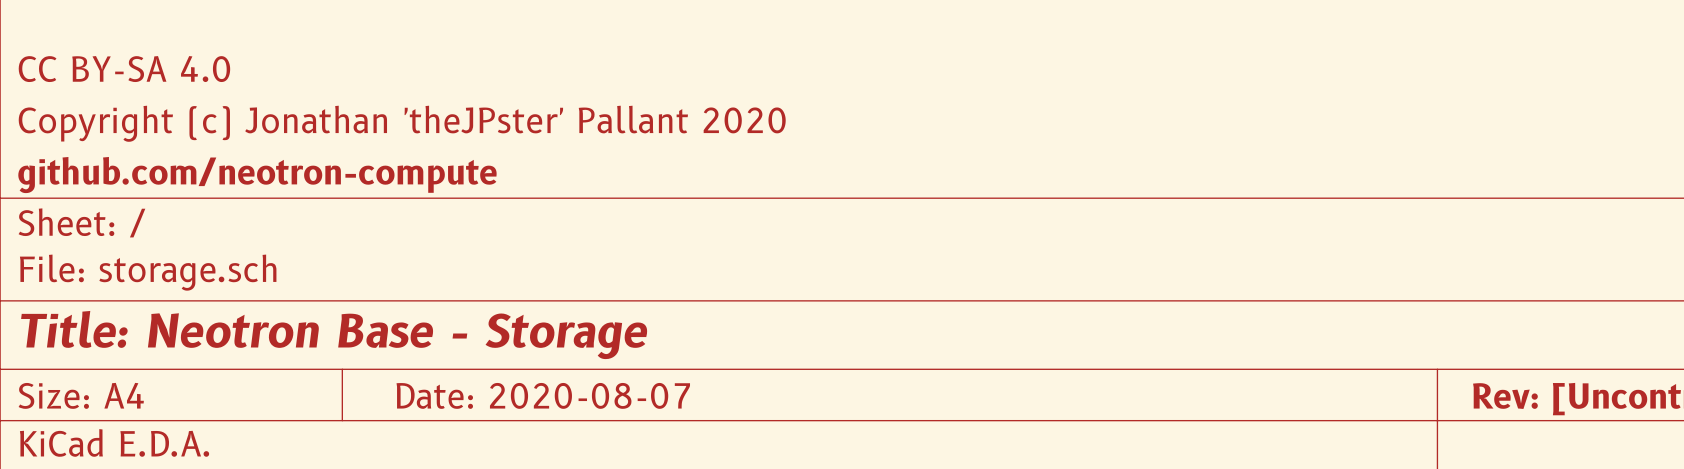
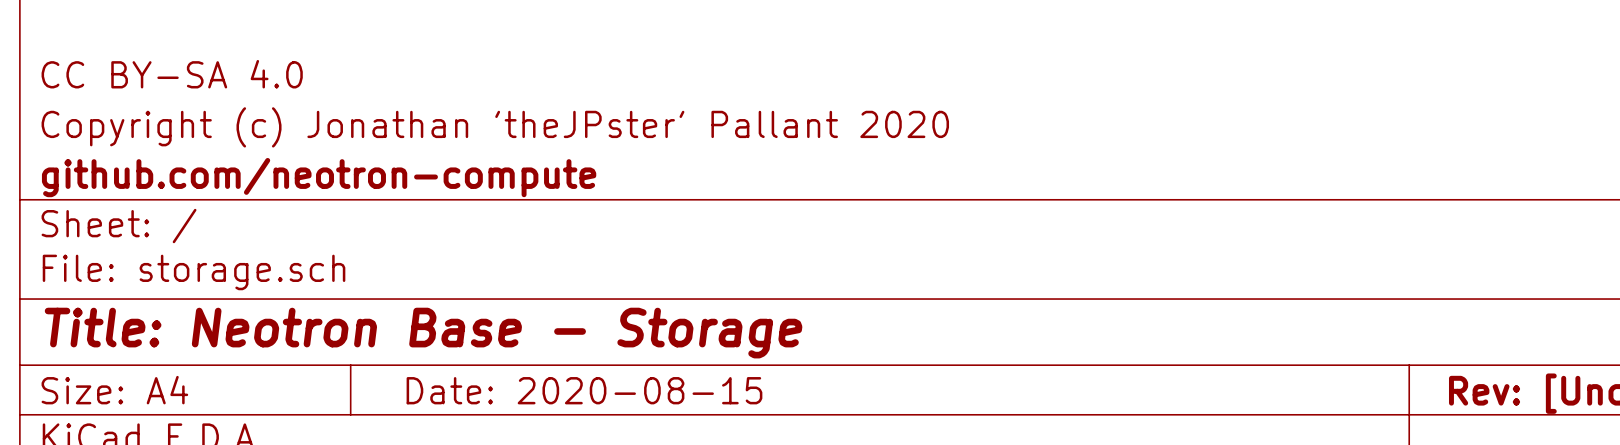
title block: Date: 2020-08-07 (543, 395) -> Date: 2020-08-15 (584, 390)

